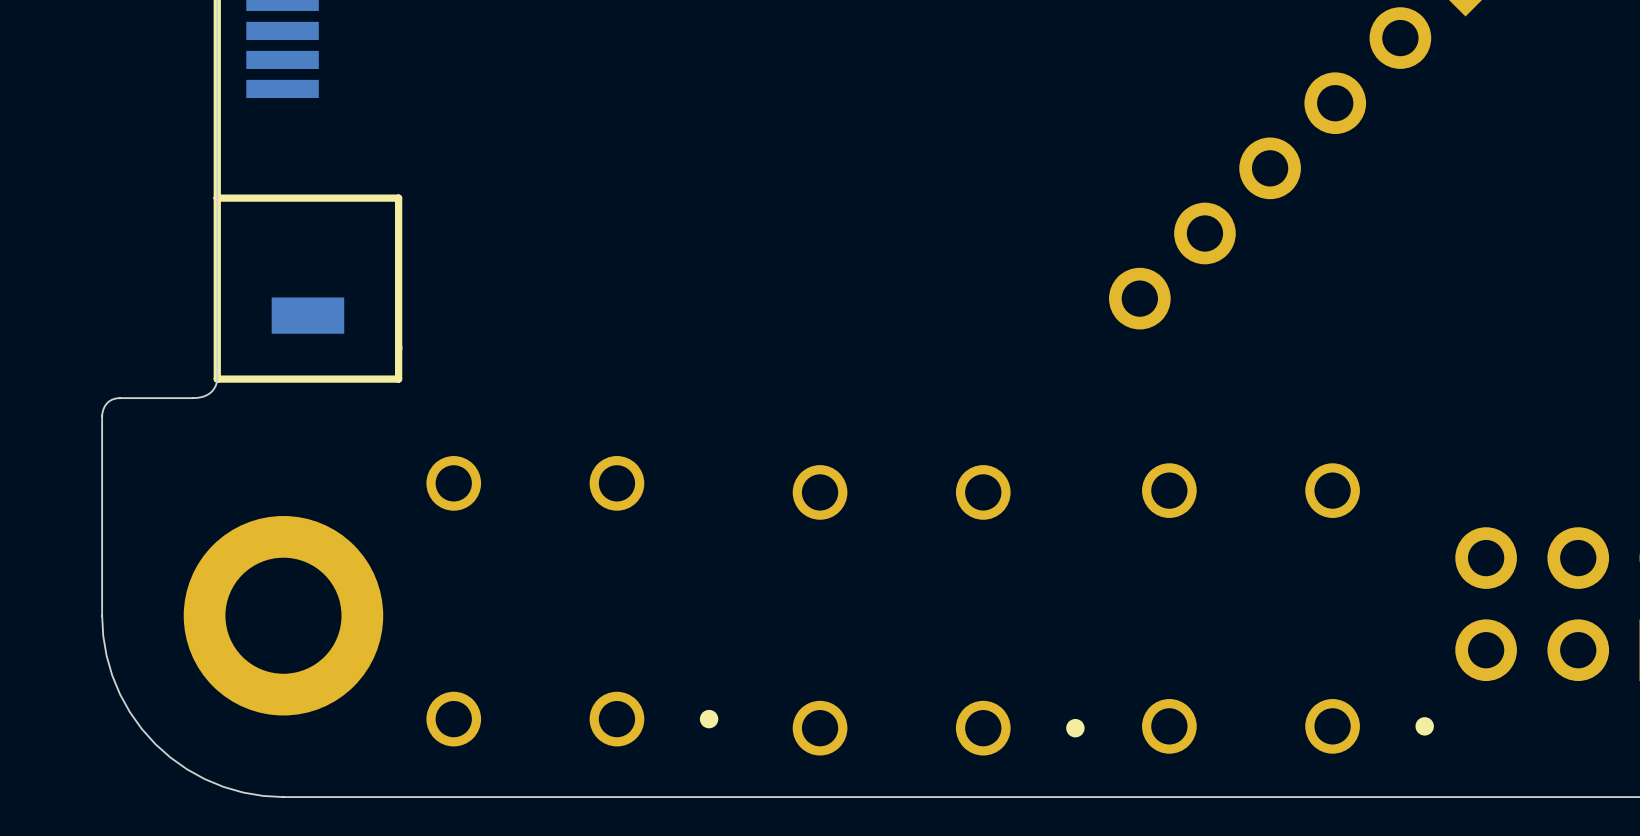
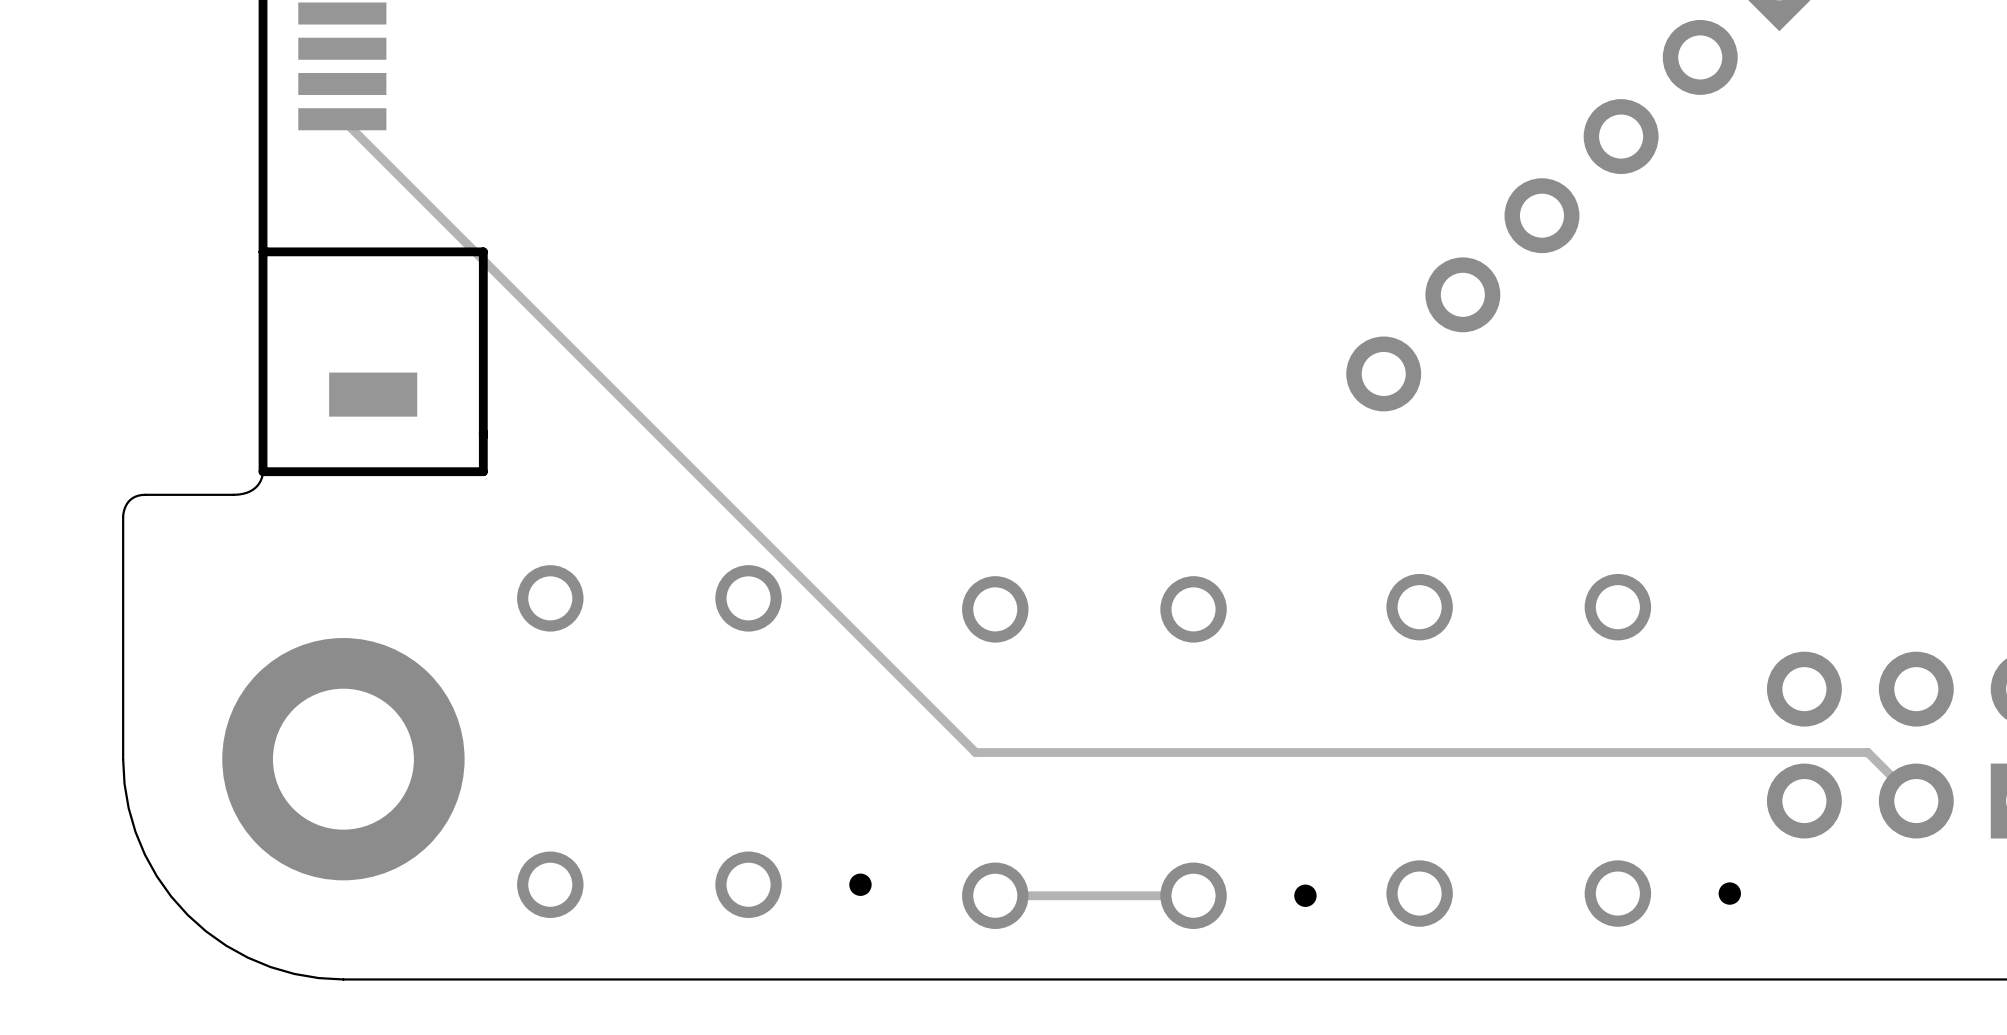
track: none -> (342, 119) (975, 752) (1867, 752) (1916, 801)
track: none -> (1193, 895) (995, 895)

